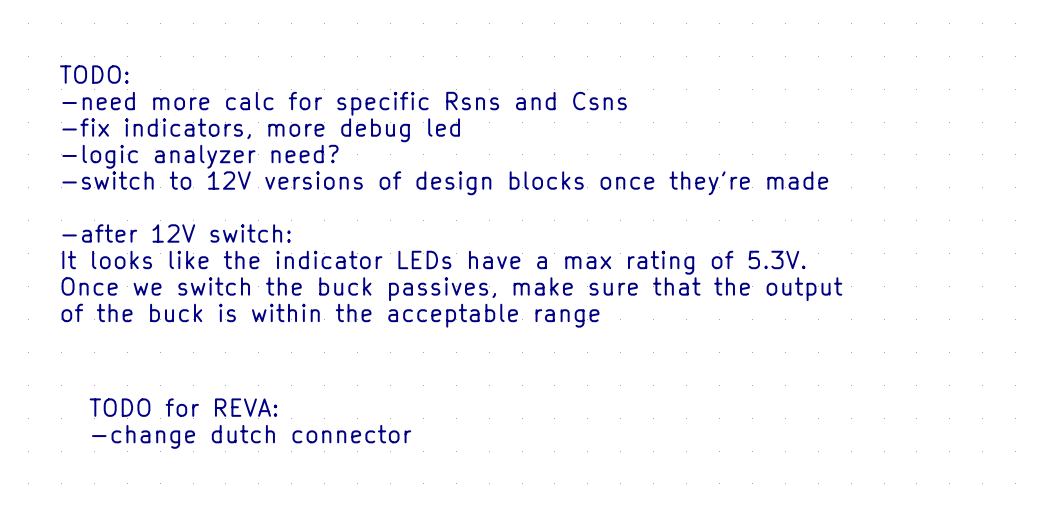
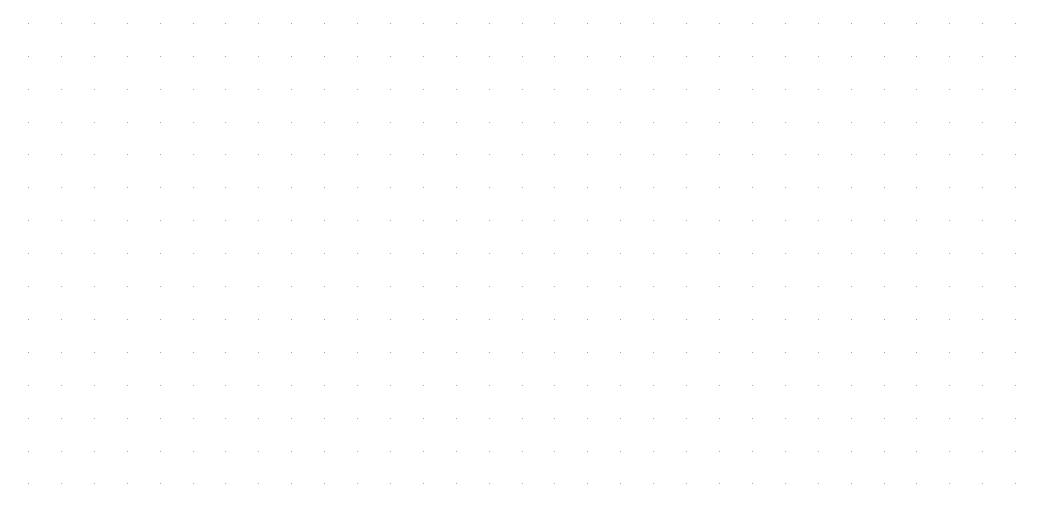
text: TODO: (94, 74) -> none
text: -need more calc for specific Rsns and Csns (344, 103) -> none
text: -fix indicators, more debug led (261, 130) -> none
text: -logic analyzer need? (200, 156) -> none
text: -switch to 12V versions of design blocks once they're made (445, 183) -> none
text: -after 12V switch: (176, 233) -> none
text: It looks like the indicator LEDs have a max rating of 5.3V. (433, 262) -> none
text: Once we switch the buck passives, make sure that the output (451, 289) -> none
text: of the buck is within the acceptable range (330, 315) -> none
text: TODO for REVA: (183, 407) -> none
text: -change dutch connector (251, 436) -> none

